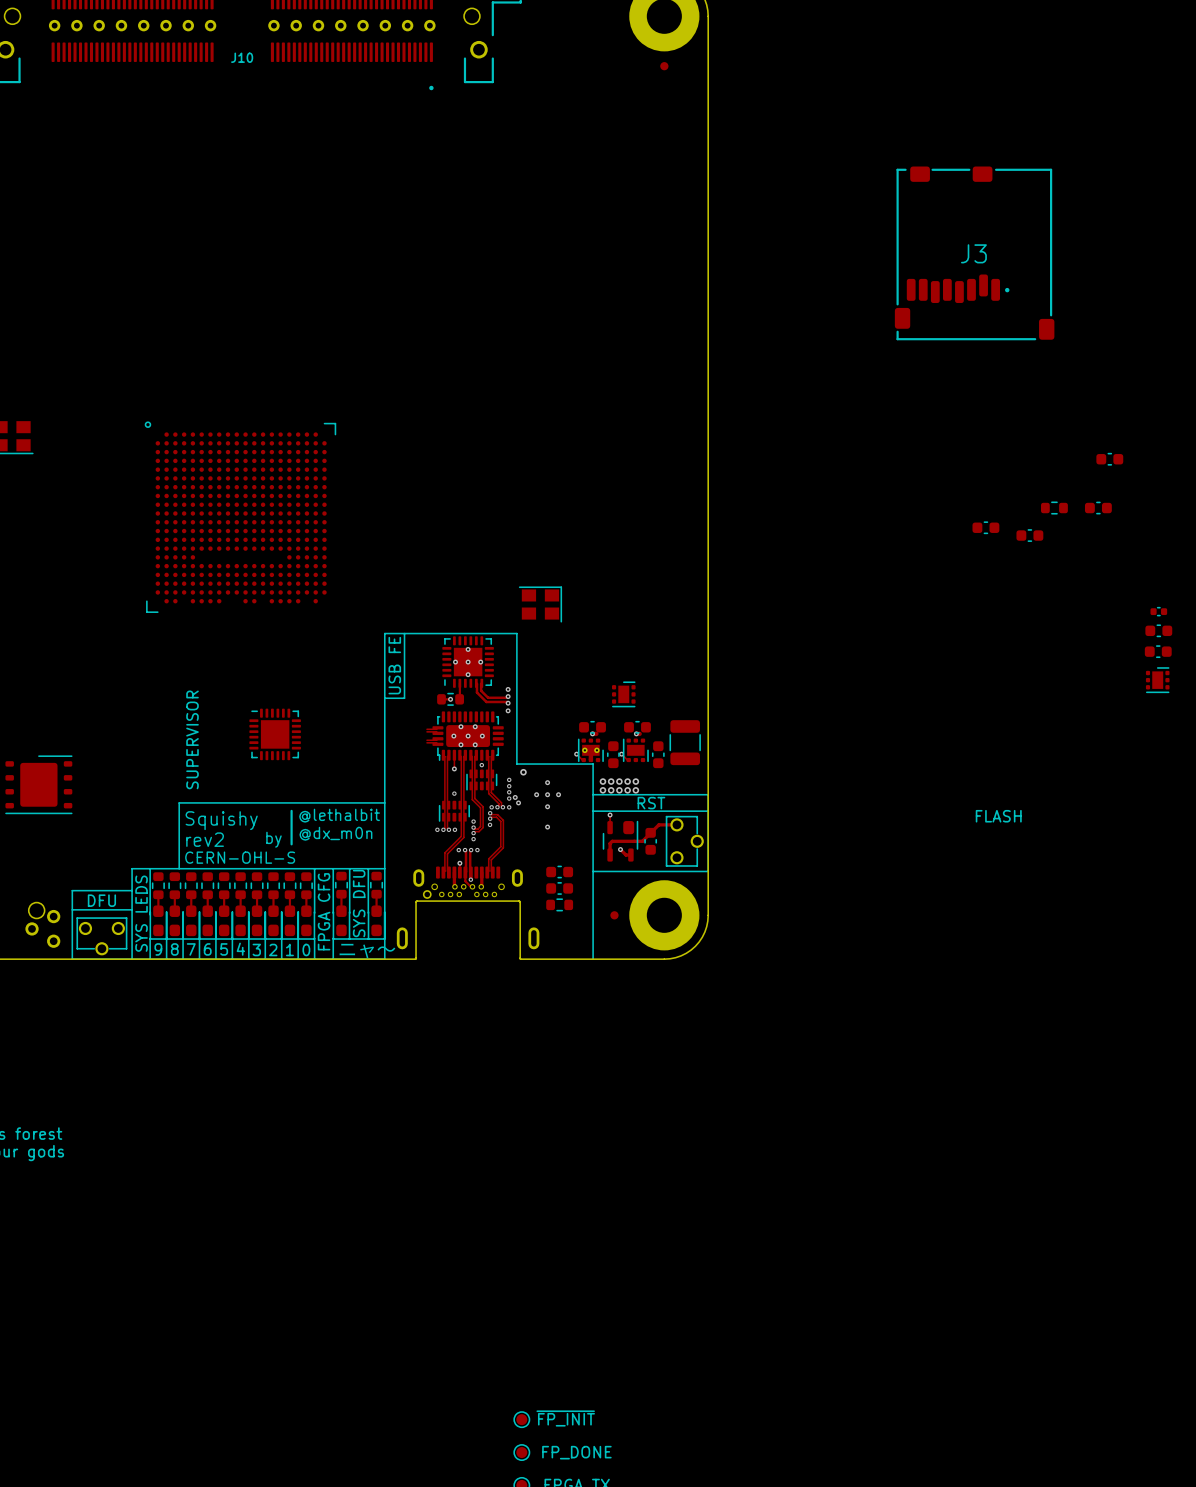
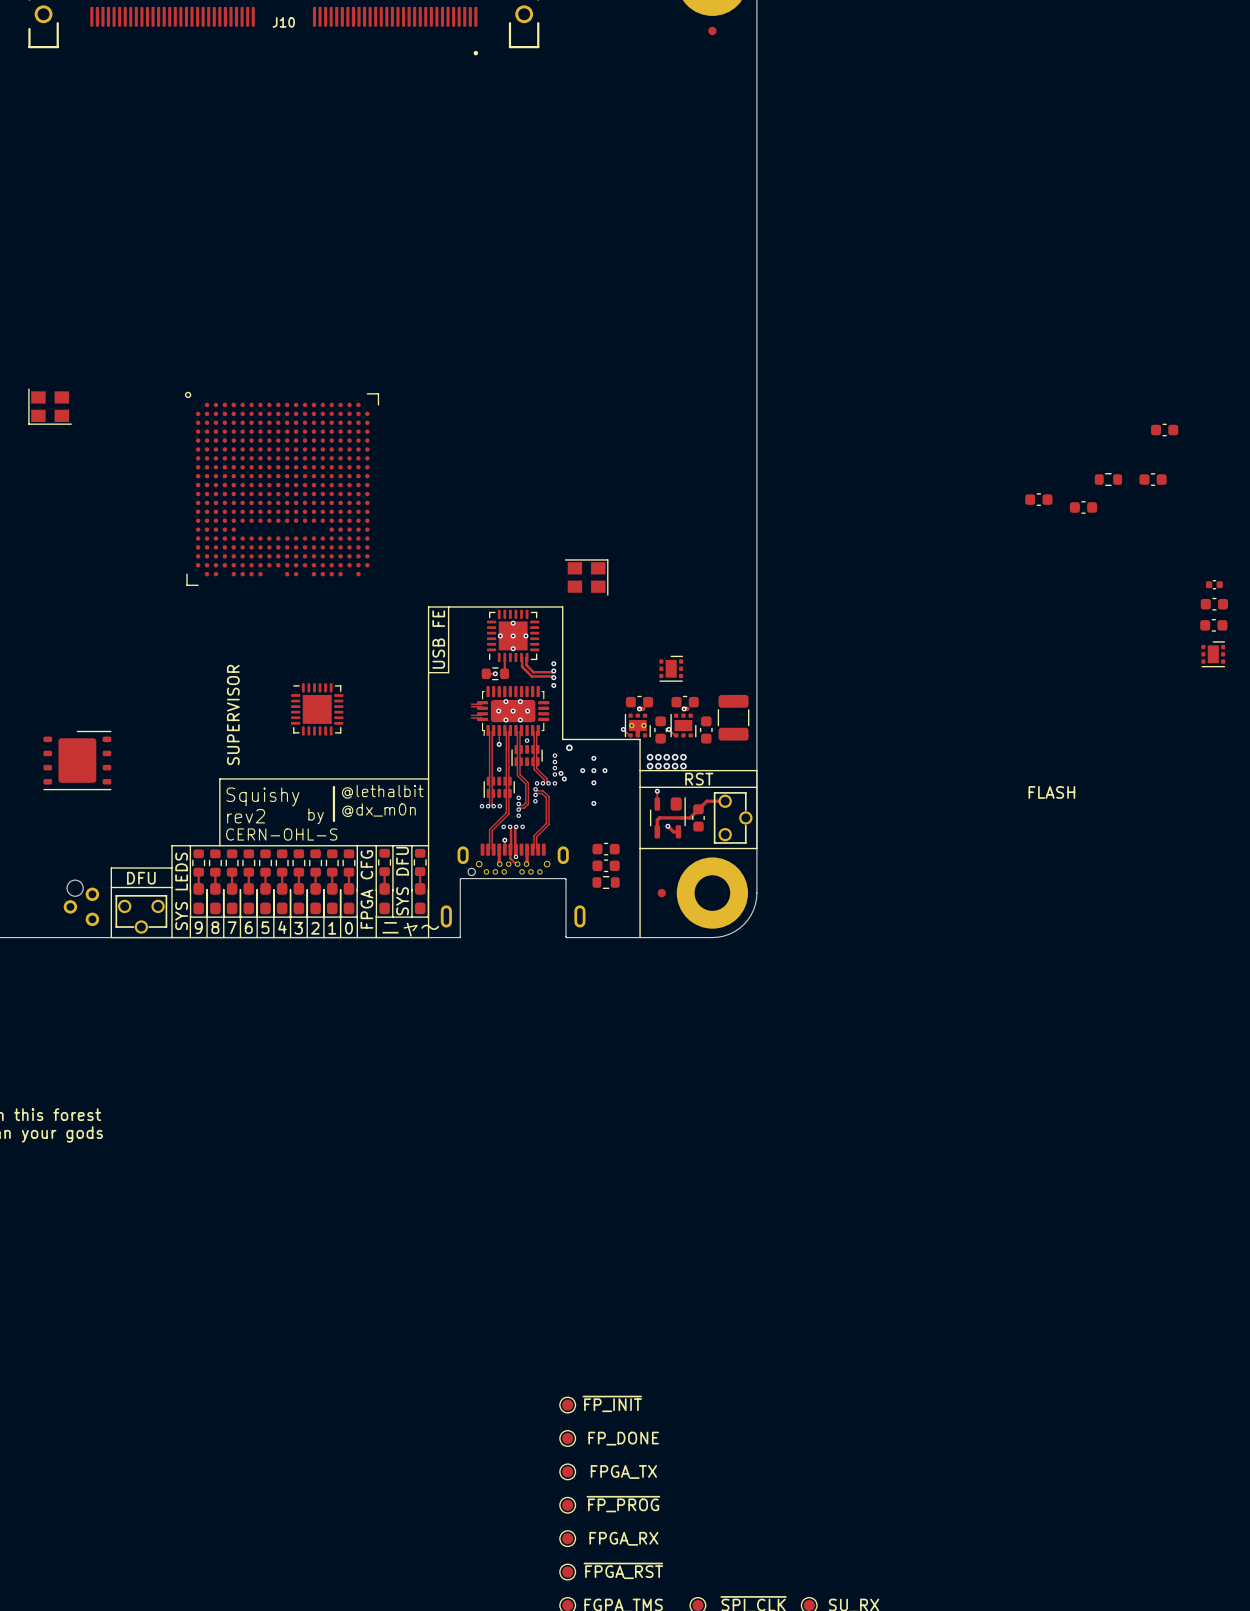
J3: (974, 253) -> none

